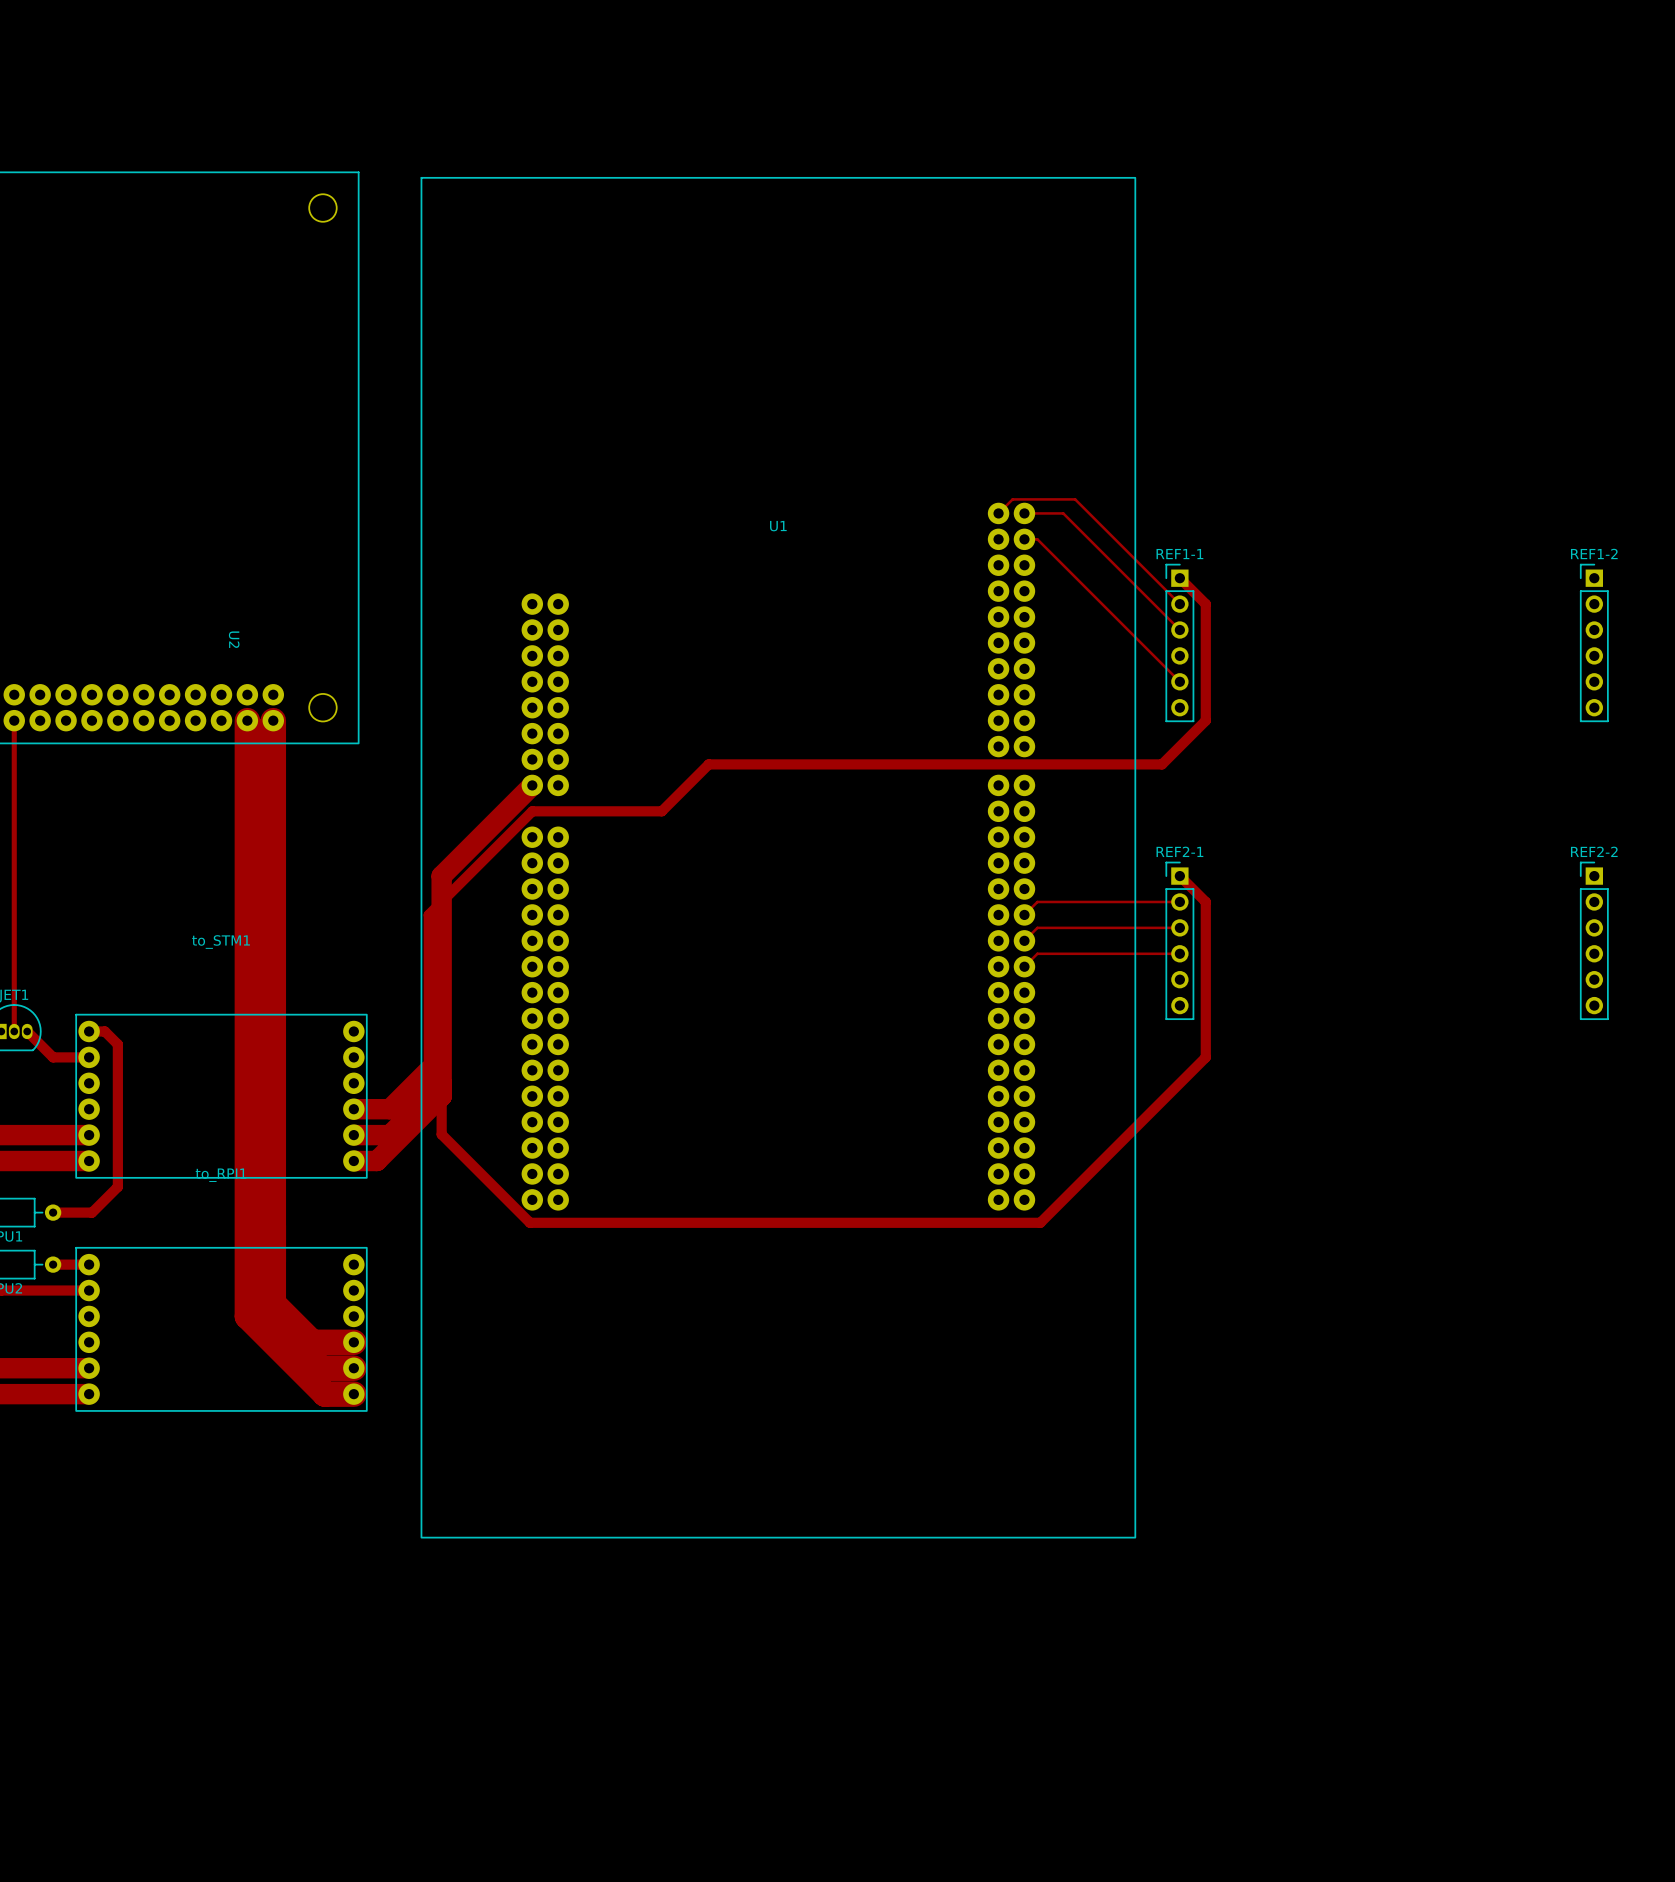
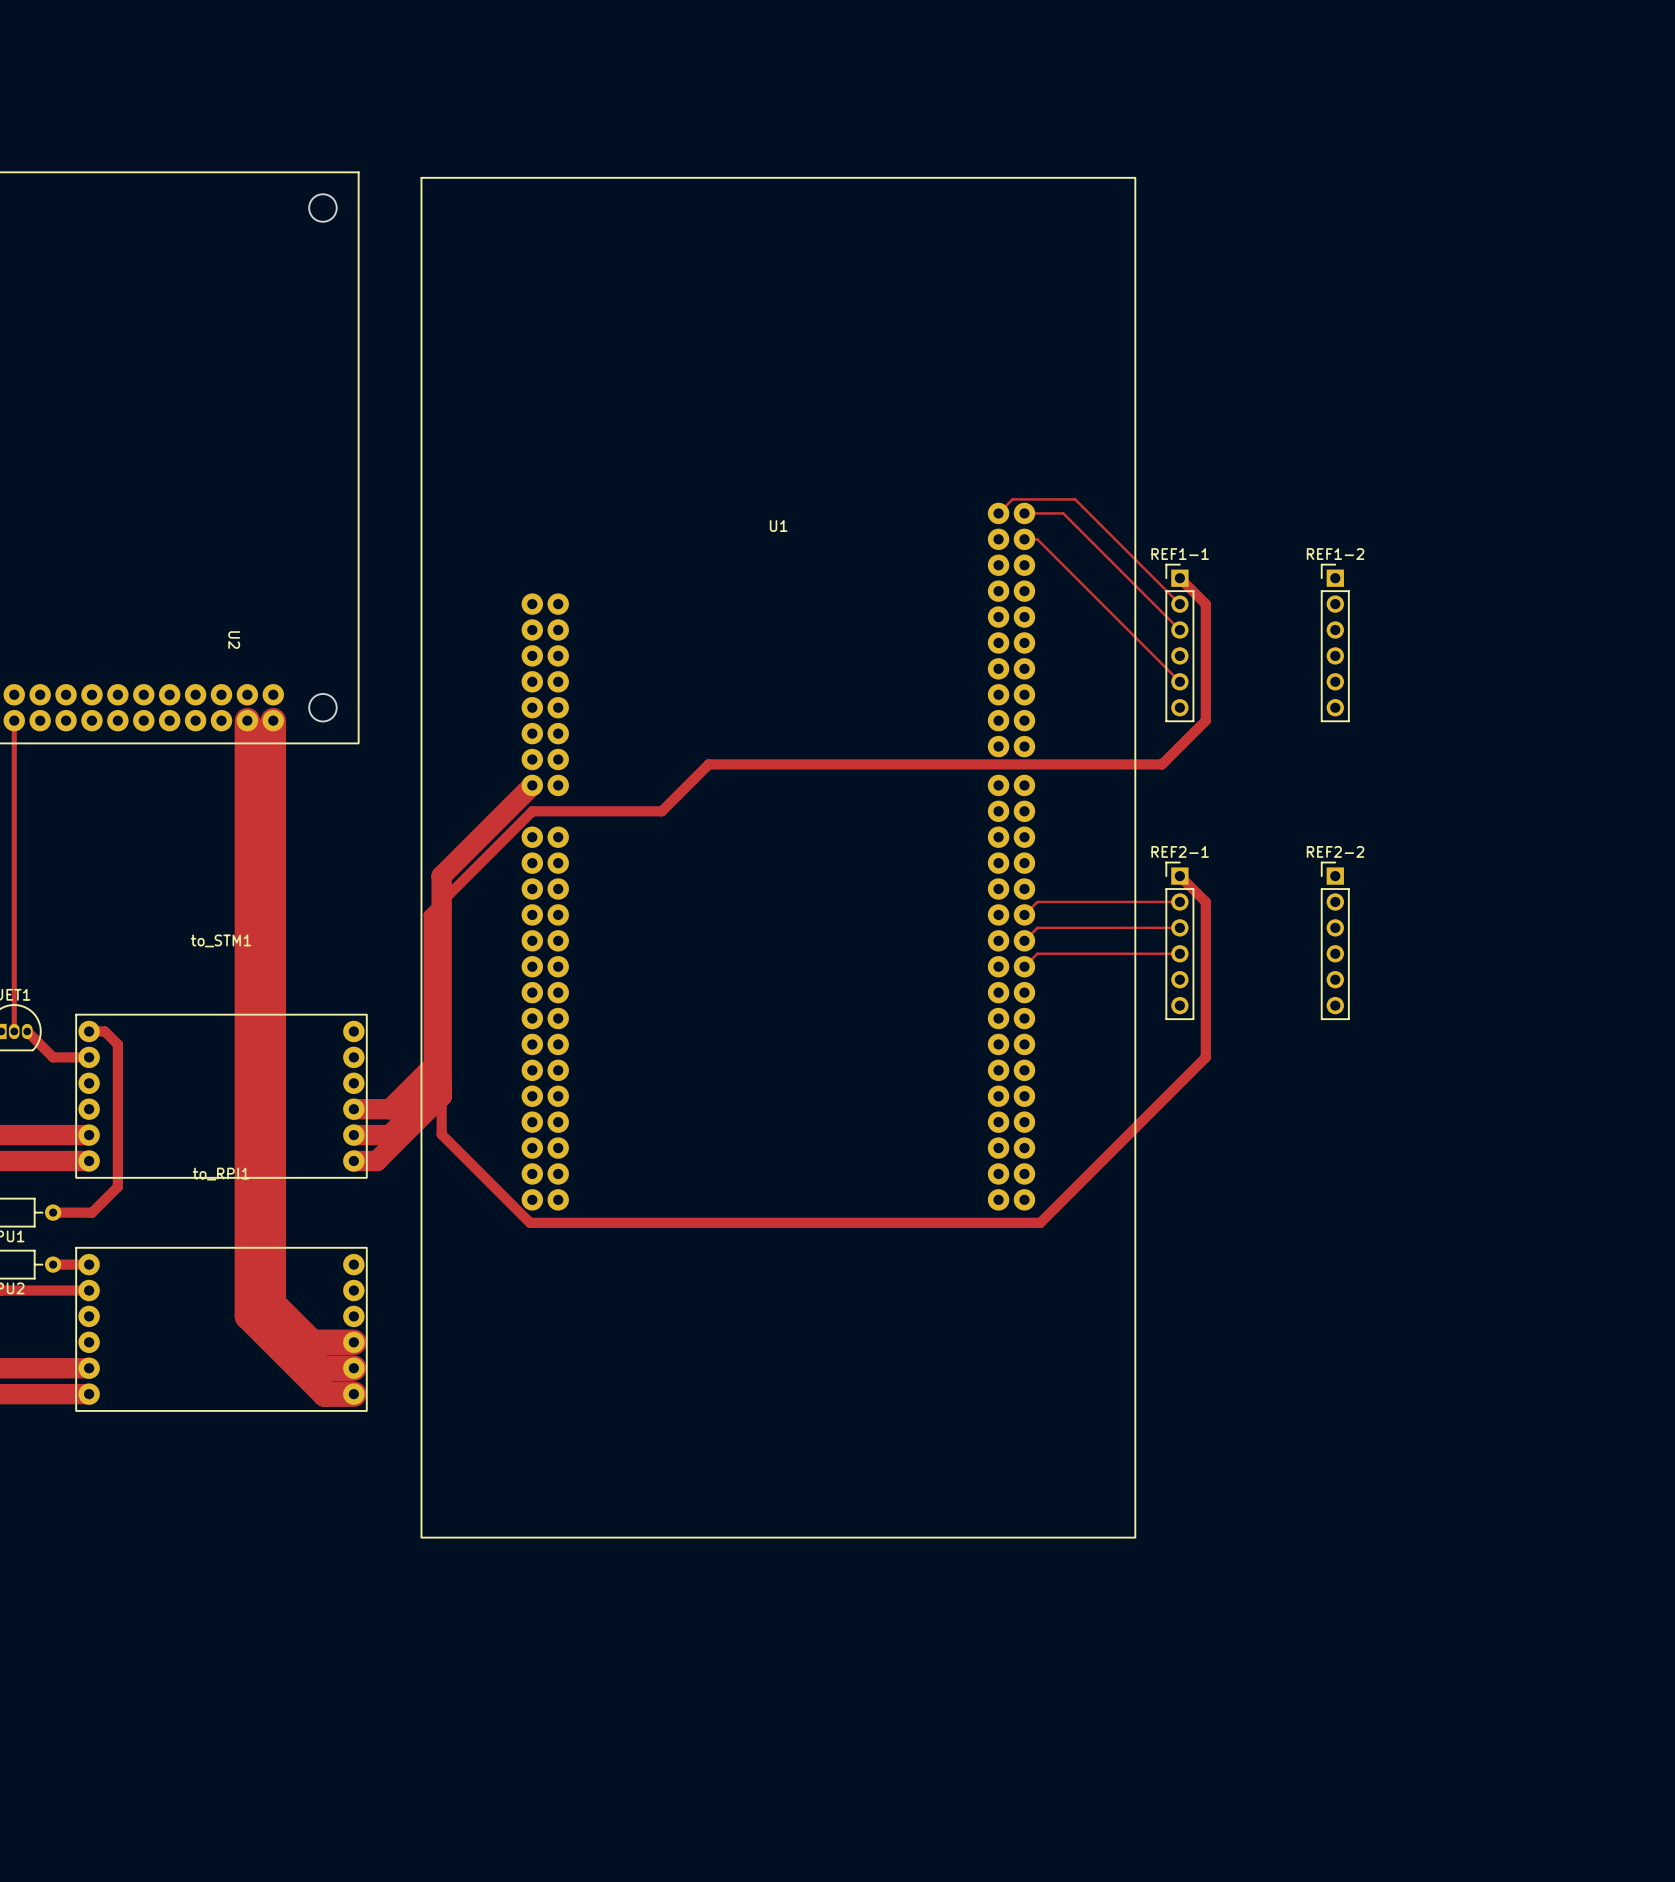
REF1-2 position: (1594, 642) -> (1335, 642)
REF2-2 position: (1594, 940) -> (1335, 940)

